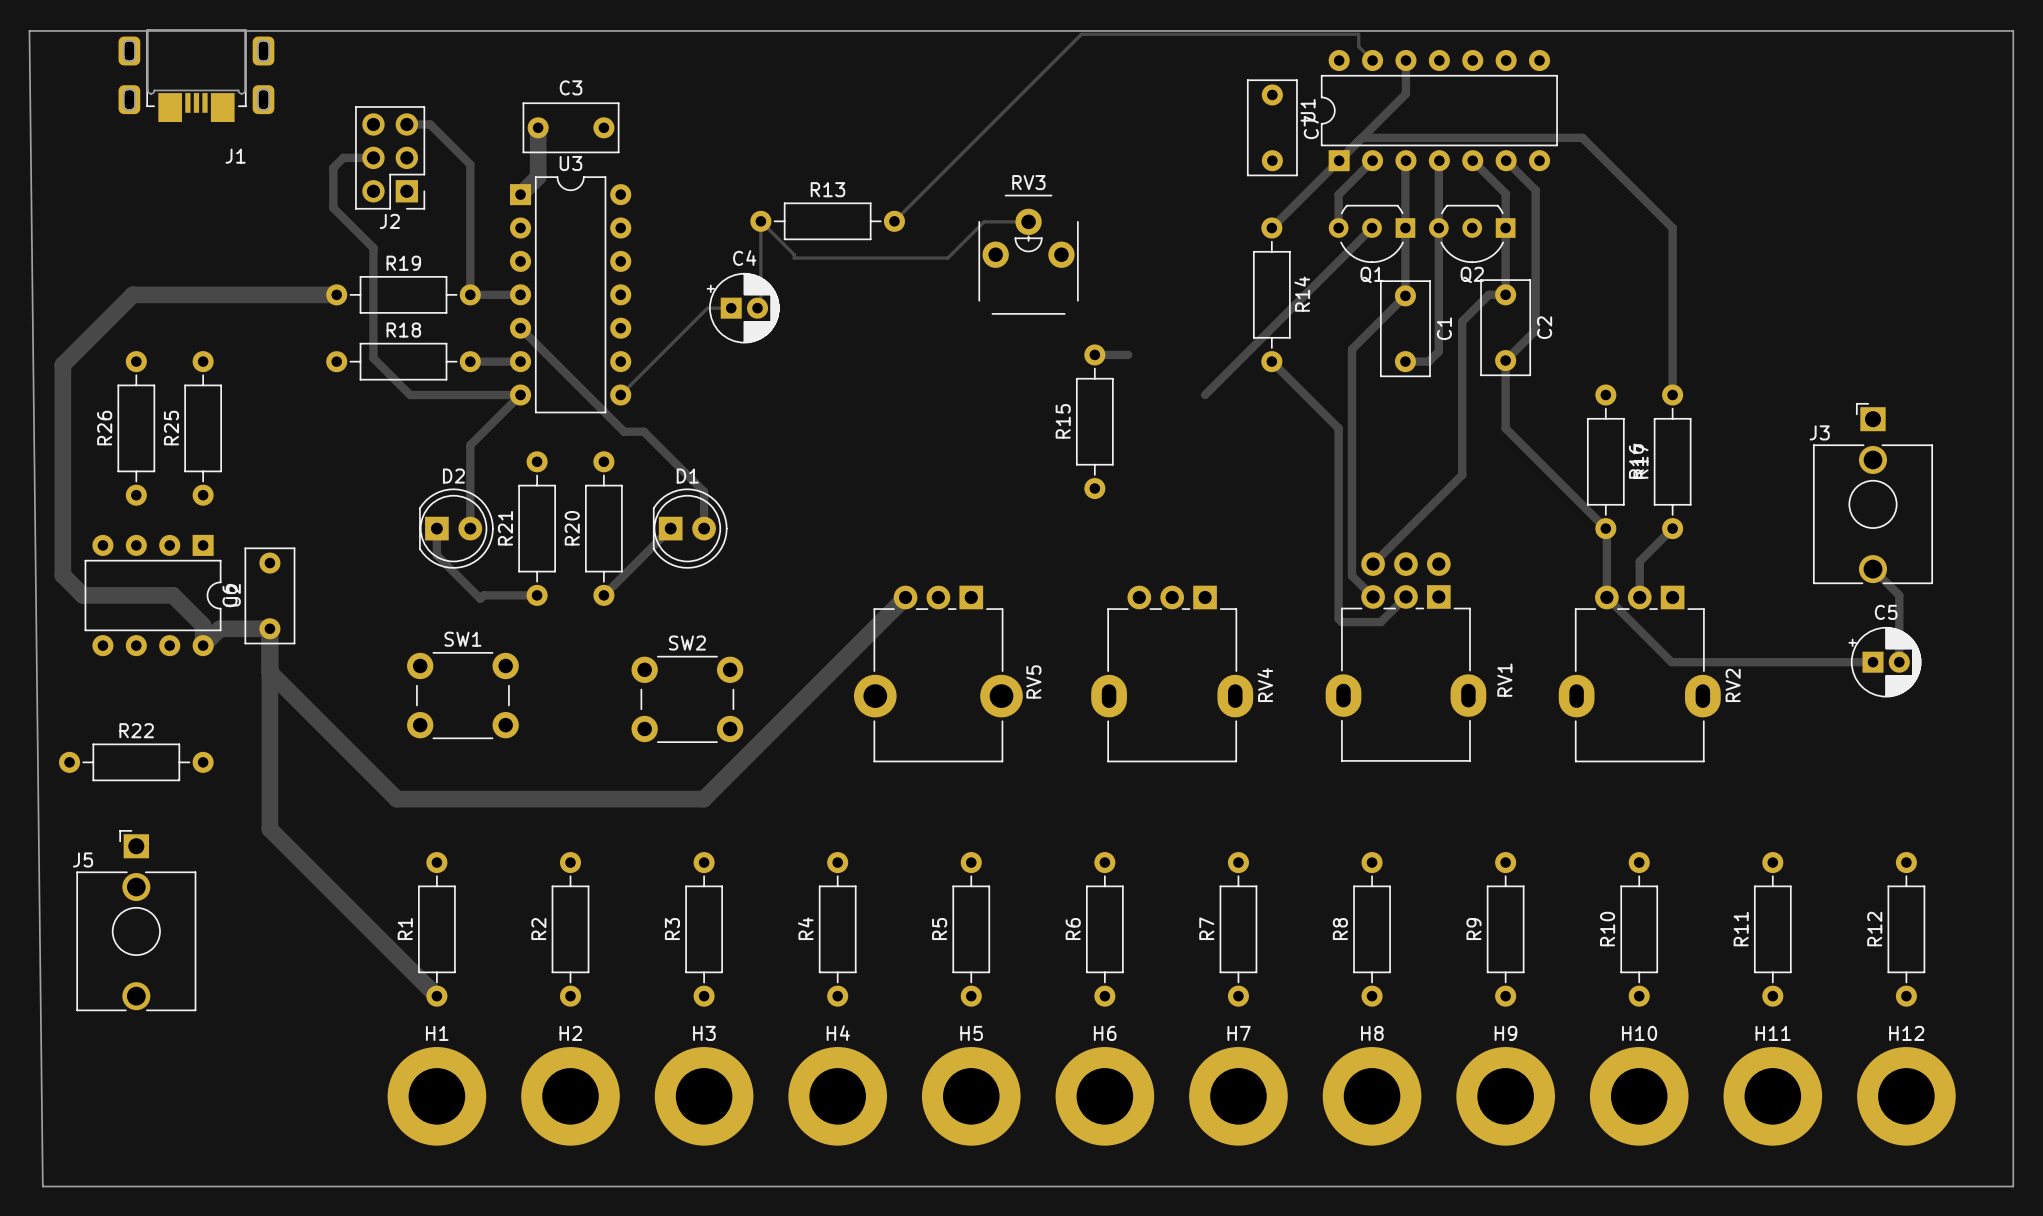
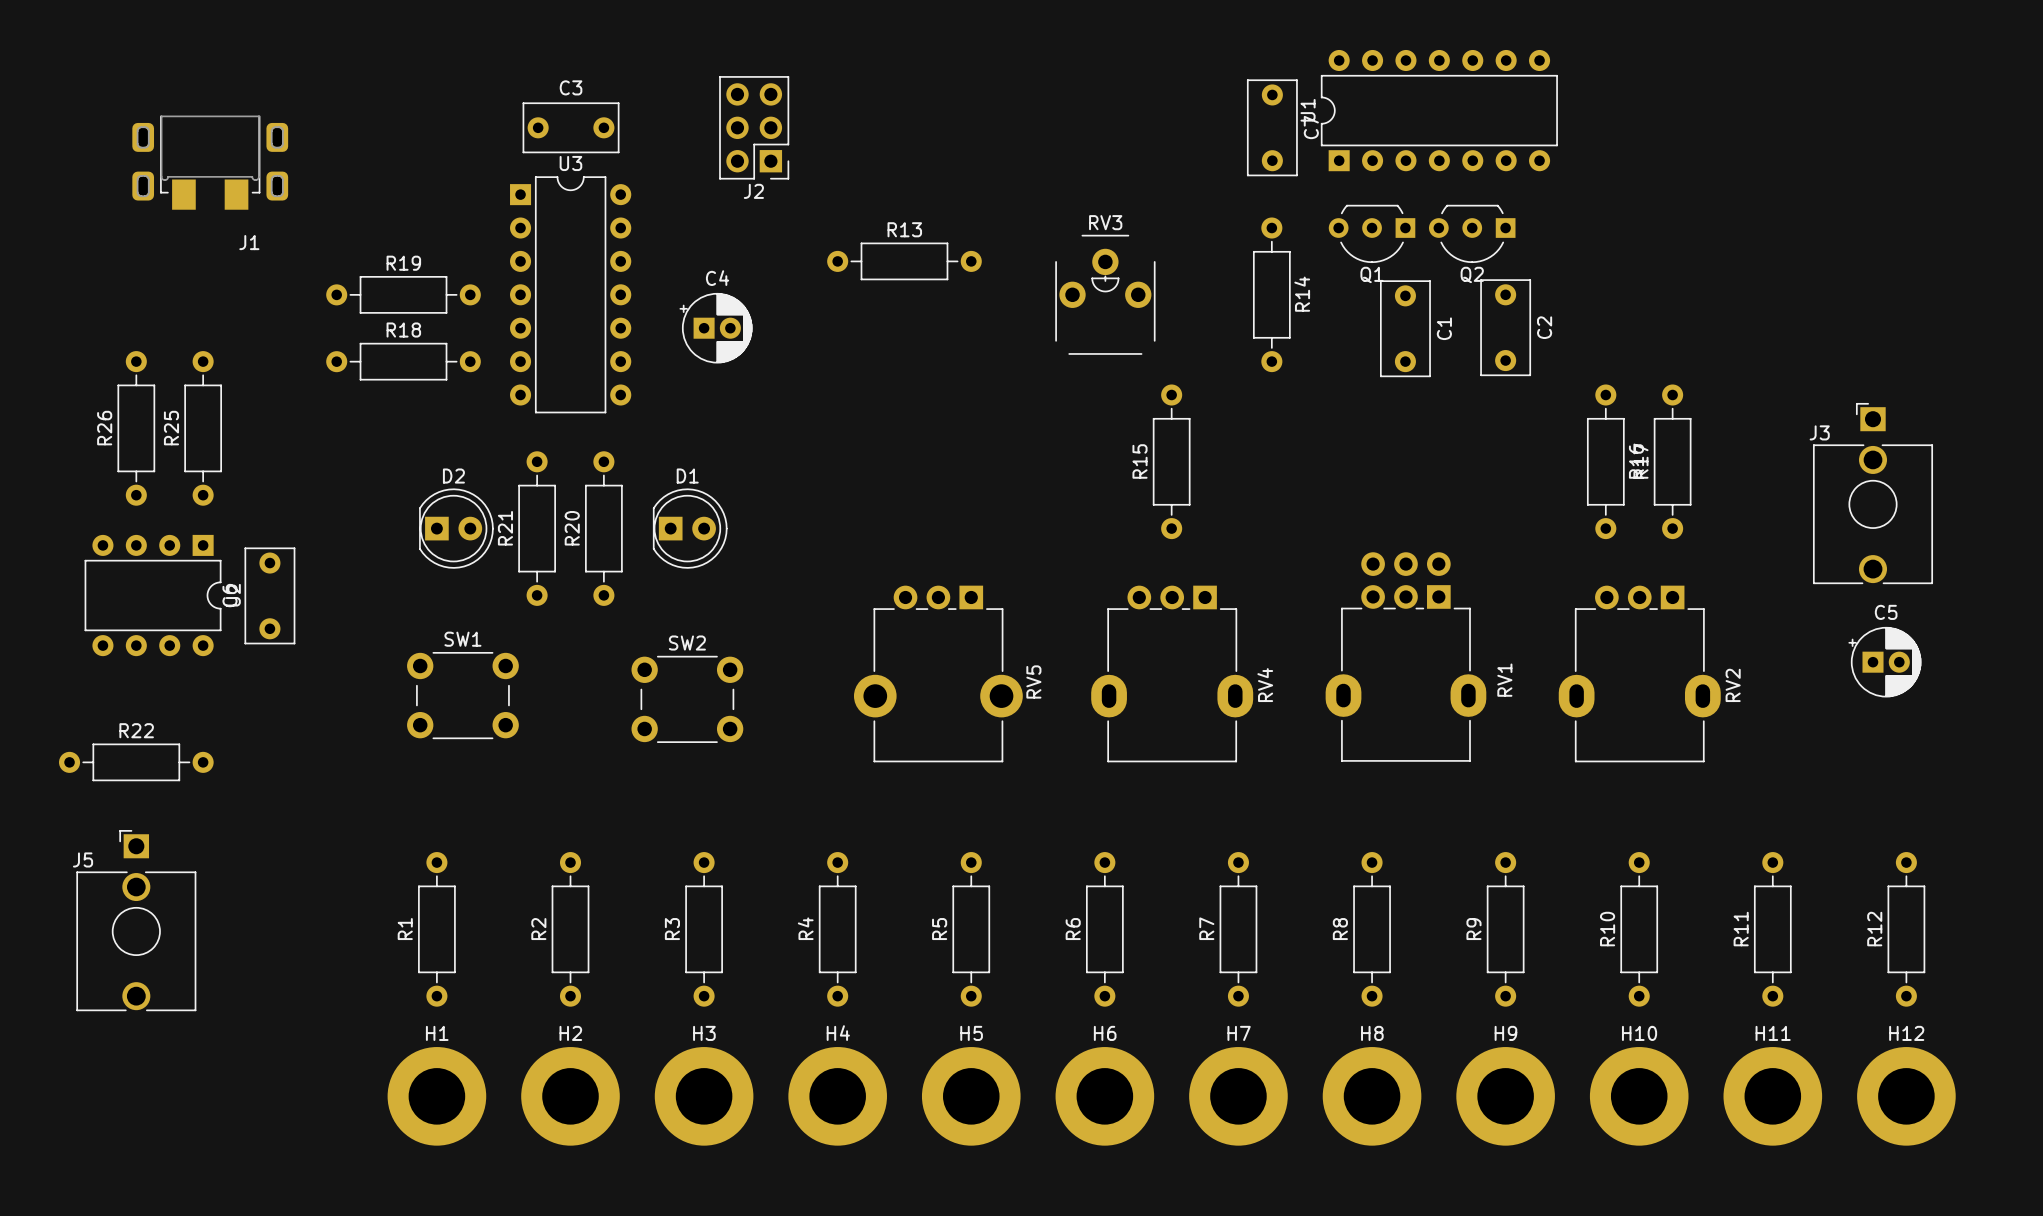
J1 footprint: [118, 29, 275, 123] -> [132, 115, 289, 210]
board edge: (29, 30) (2013, 30) (2013, 1186) (42, 1186) (29, 30) -> none
track: (1372, 60) (1358, 46) (1358, 34) (1081, 34) (894, 221) -> none
track: (1405, 60) (1405, 93) (1271, 228) -> none
track: (406, 124) (430, 124) (470, 164) (470, 294) (520, 294) -> none
track: (538, 127) (538, 176) (520, 194) -> none
track: (1362, 137) (1582, 137) (1672, 228) (1672, 395) -> none
track: (373, 157) (343, 157) (333, 167) (333, 207) (373, 248) (373, 358) (410, 395) (520, 395) (470, 445) (470, 528) -> none
J2 position: (390, 157) -> (754, 127)
track: (1372, 160) (1338, 194) (1338, 228) -> none
track: (1405, 160) (1405, 295) (1352, 349) (1352, 575) (1373, 596) -> none
track: (1439, 160) (1438, 351) (1428, 361) (1405, 361) -> none
track: (1472, 160) (1505, 193) (1505, 294) (1488, 294) (1462, 321) (1462, 474) (1373, 564) -> none
track: (1506, 160) (1535, 190) (1535, 331) (1505, 360) (1505, 428) (1606, 529) (1606, 597) (1671, 662) (1873, 662) -> none
R13 position: (827, 221) -> (904, 261)
track: (1028, 221) (984, 221) (947, 258) (794, 258) (794, 254) (760, 221) (760, 304) (757, 308) -> none
track: (1372, 228) (1205, 395) -> none
RV3 position: (1028, 254) -> (1105, 294)
track: (336, 294) (132, 294) (62, 364) (62, 575) (82, 595) (173, 595) (203, 625) (203, 645) (219, 628) (269, 628) (269, 829) (436, 996) -> none
track: (731, 308) (707, 308) (620, 395) -> none
C4 position: (743, 308) -> (716, 328)
track: (520, 328) (624, 431) (643, 431) (704, 491) (704, 528) -> none
track: (1094, 354) (1128, 354) -> none
track: (470, 361) (520, 361) -> none
track: (1271, 361) (1338, 428) (1338, 618) (1341, 622) (1380, 622) (1405, 596) -> none
R15 position: (1094, 421) -> (1171, 461)
track: (436, 528) (436, 555) (480, 598) (483, 595) (537, 595) -> none
track: (670, 528) (603, 595) -> none
track: (1672, 528) (1639, 561) (1639, 597) -> none
track: (1873, 569) (1899, 595) (1899, 662) -> none
track: (905, 597) (703, 799) (396, 799) (269, 672) -> none

